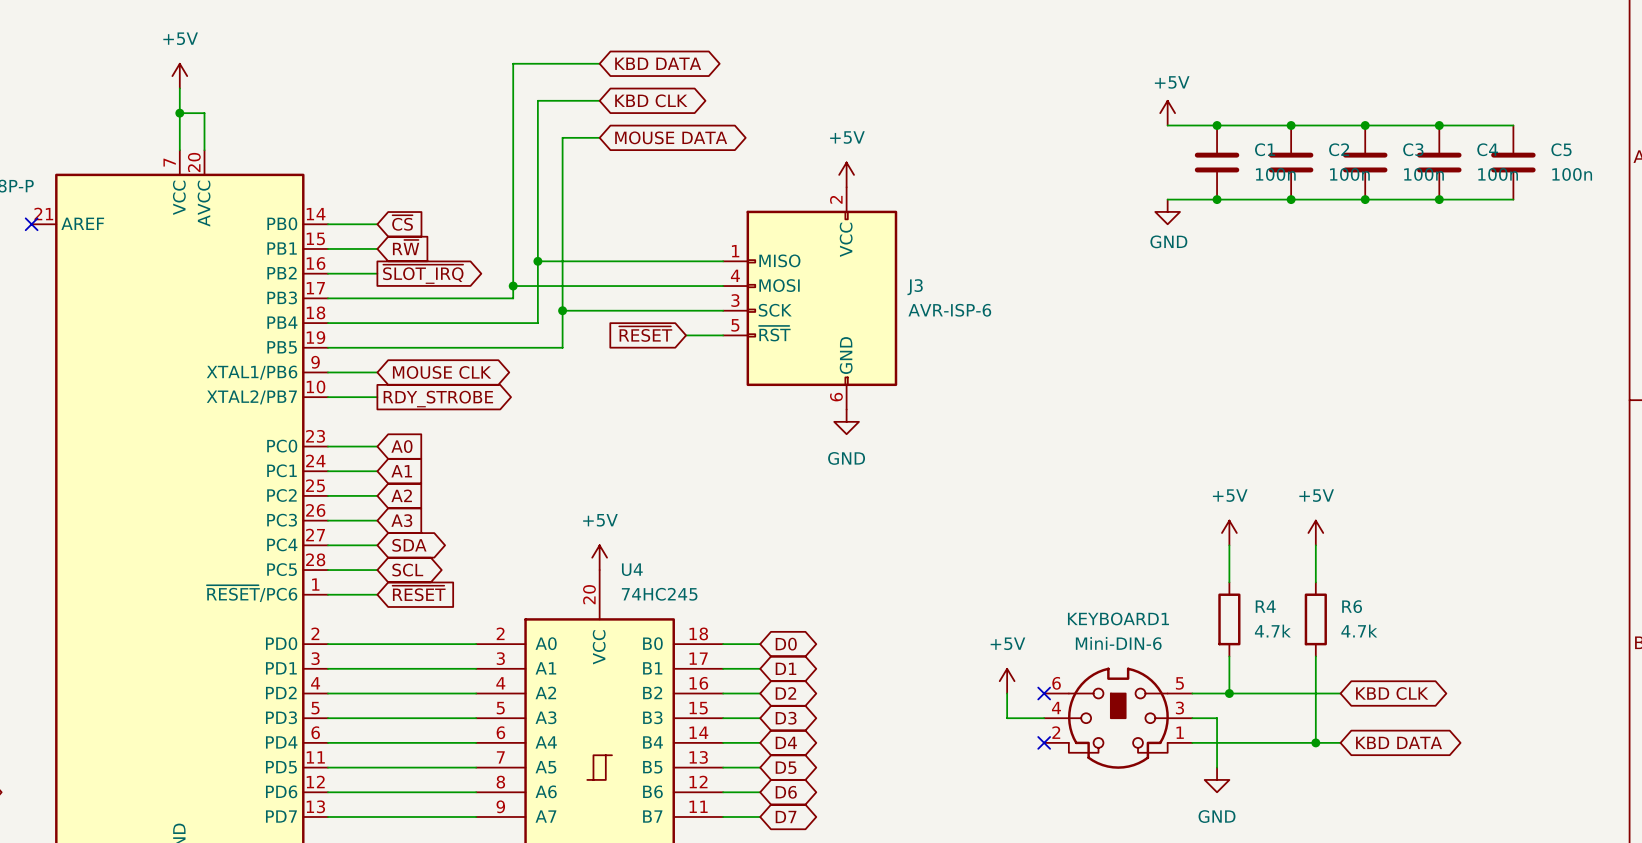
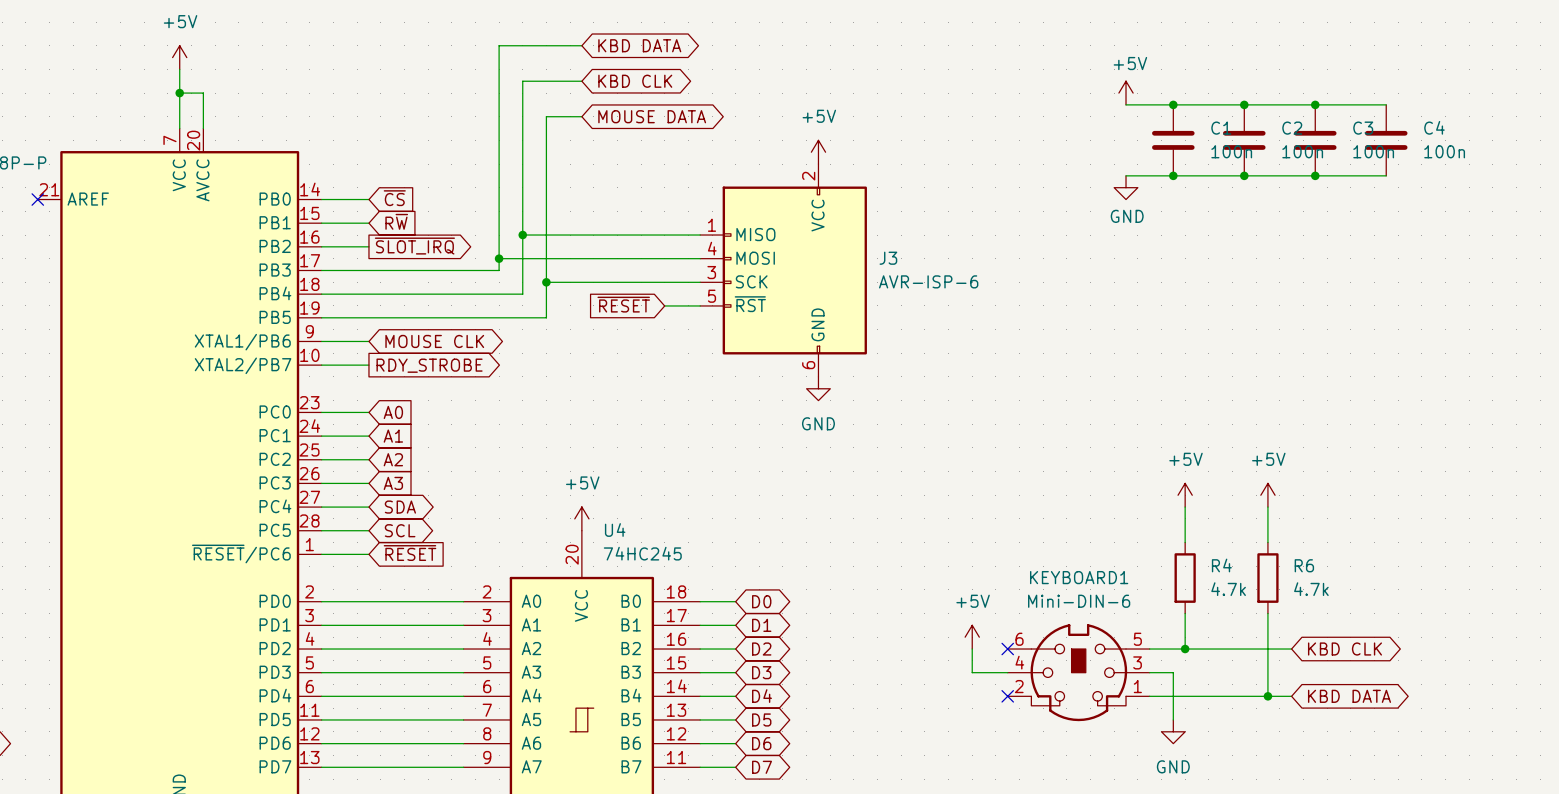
wire: (1439, 125) (1513, 125) -> none
junction: (1439, 125) -> none
C5: 100n (1513, 162) -> none
wire: (1439, 199) (1513, 199) -> none
junction: (1439, 199) -> none

